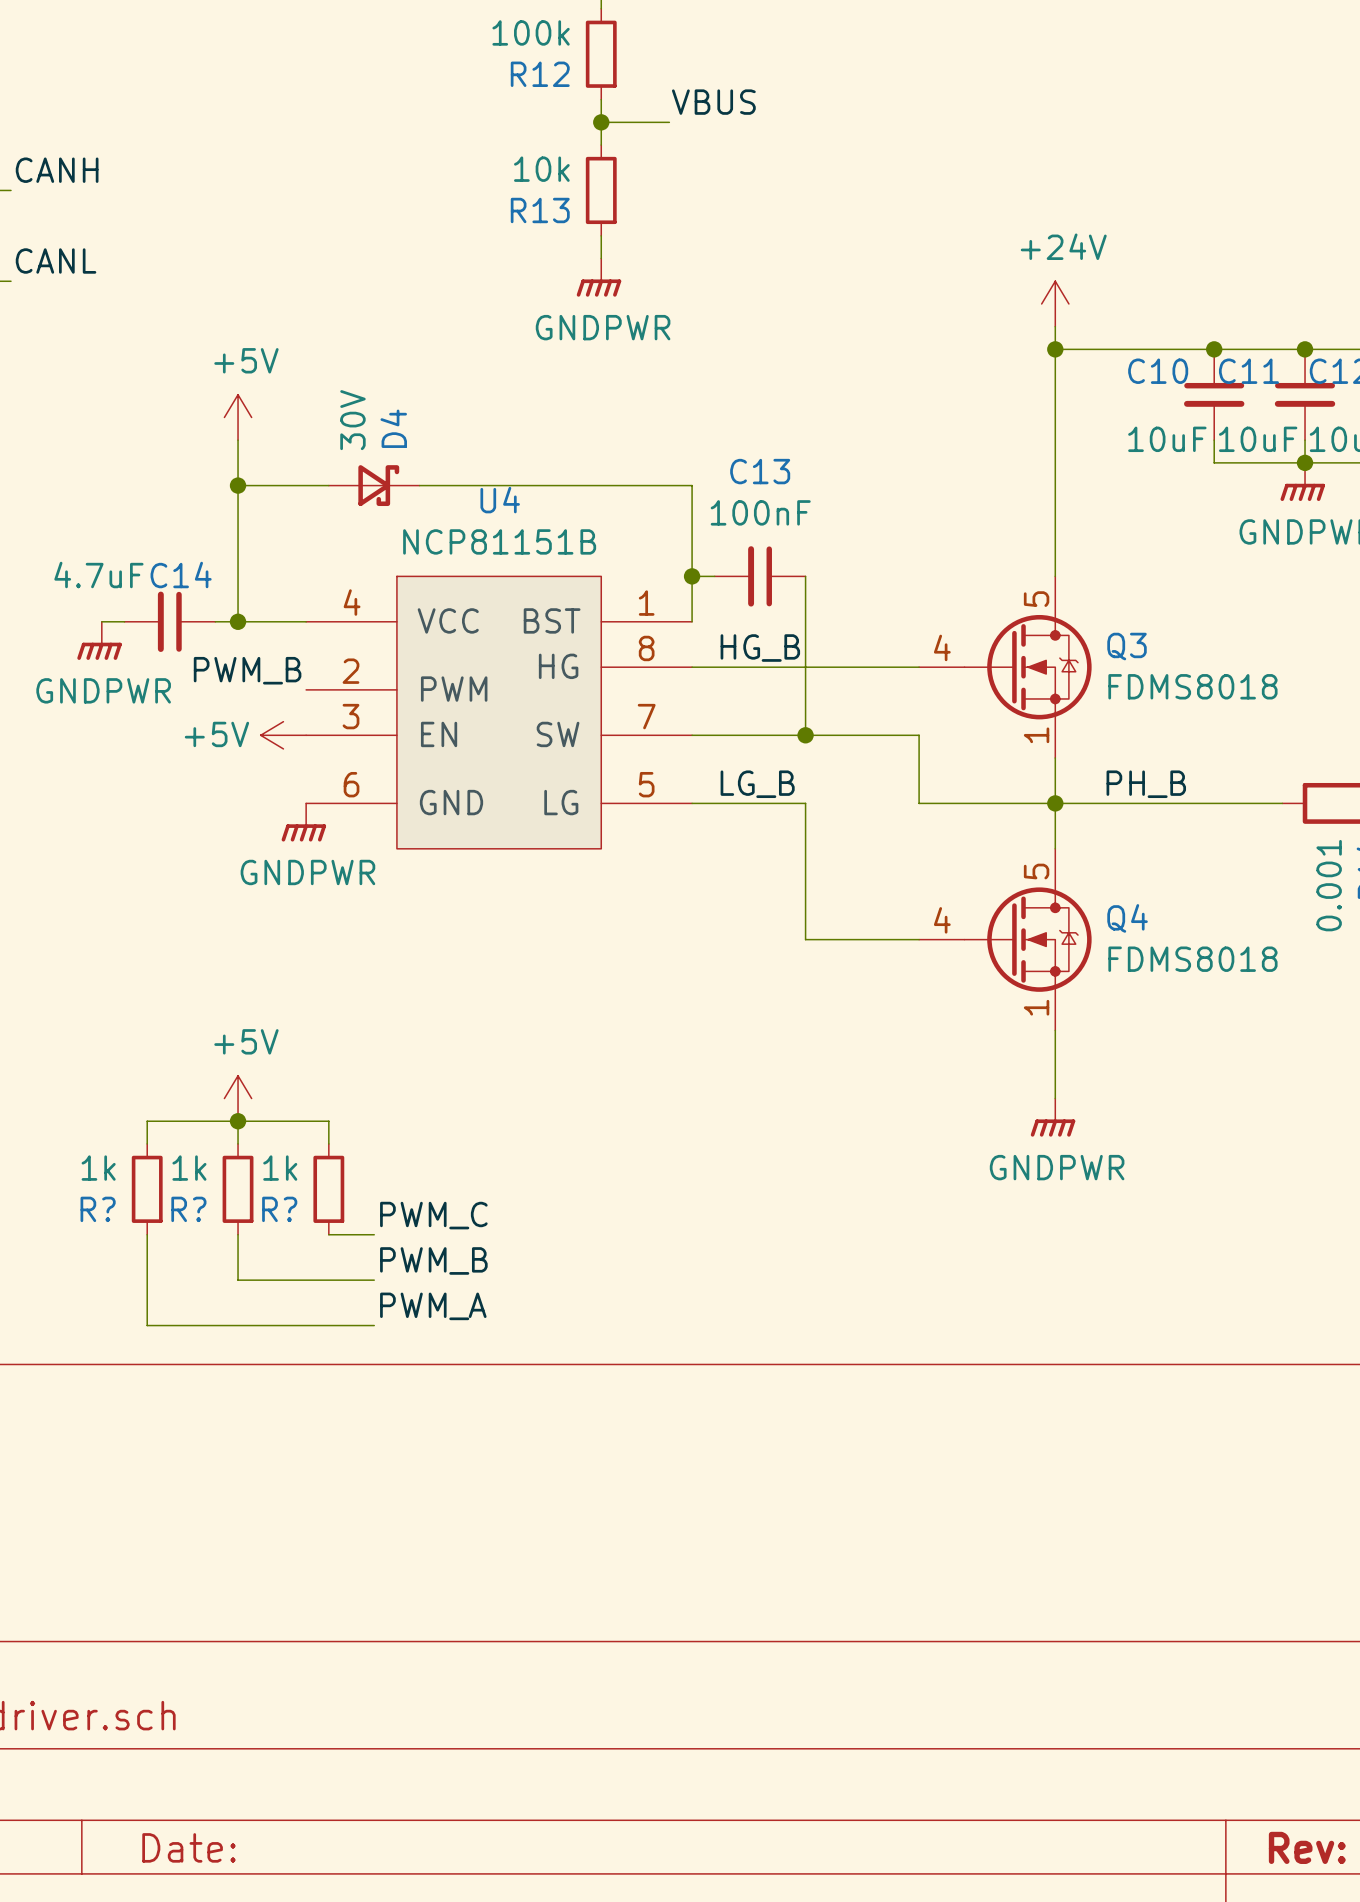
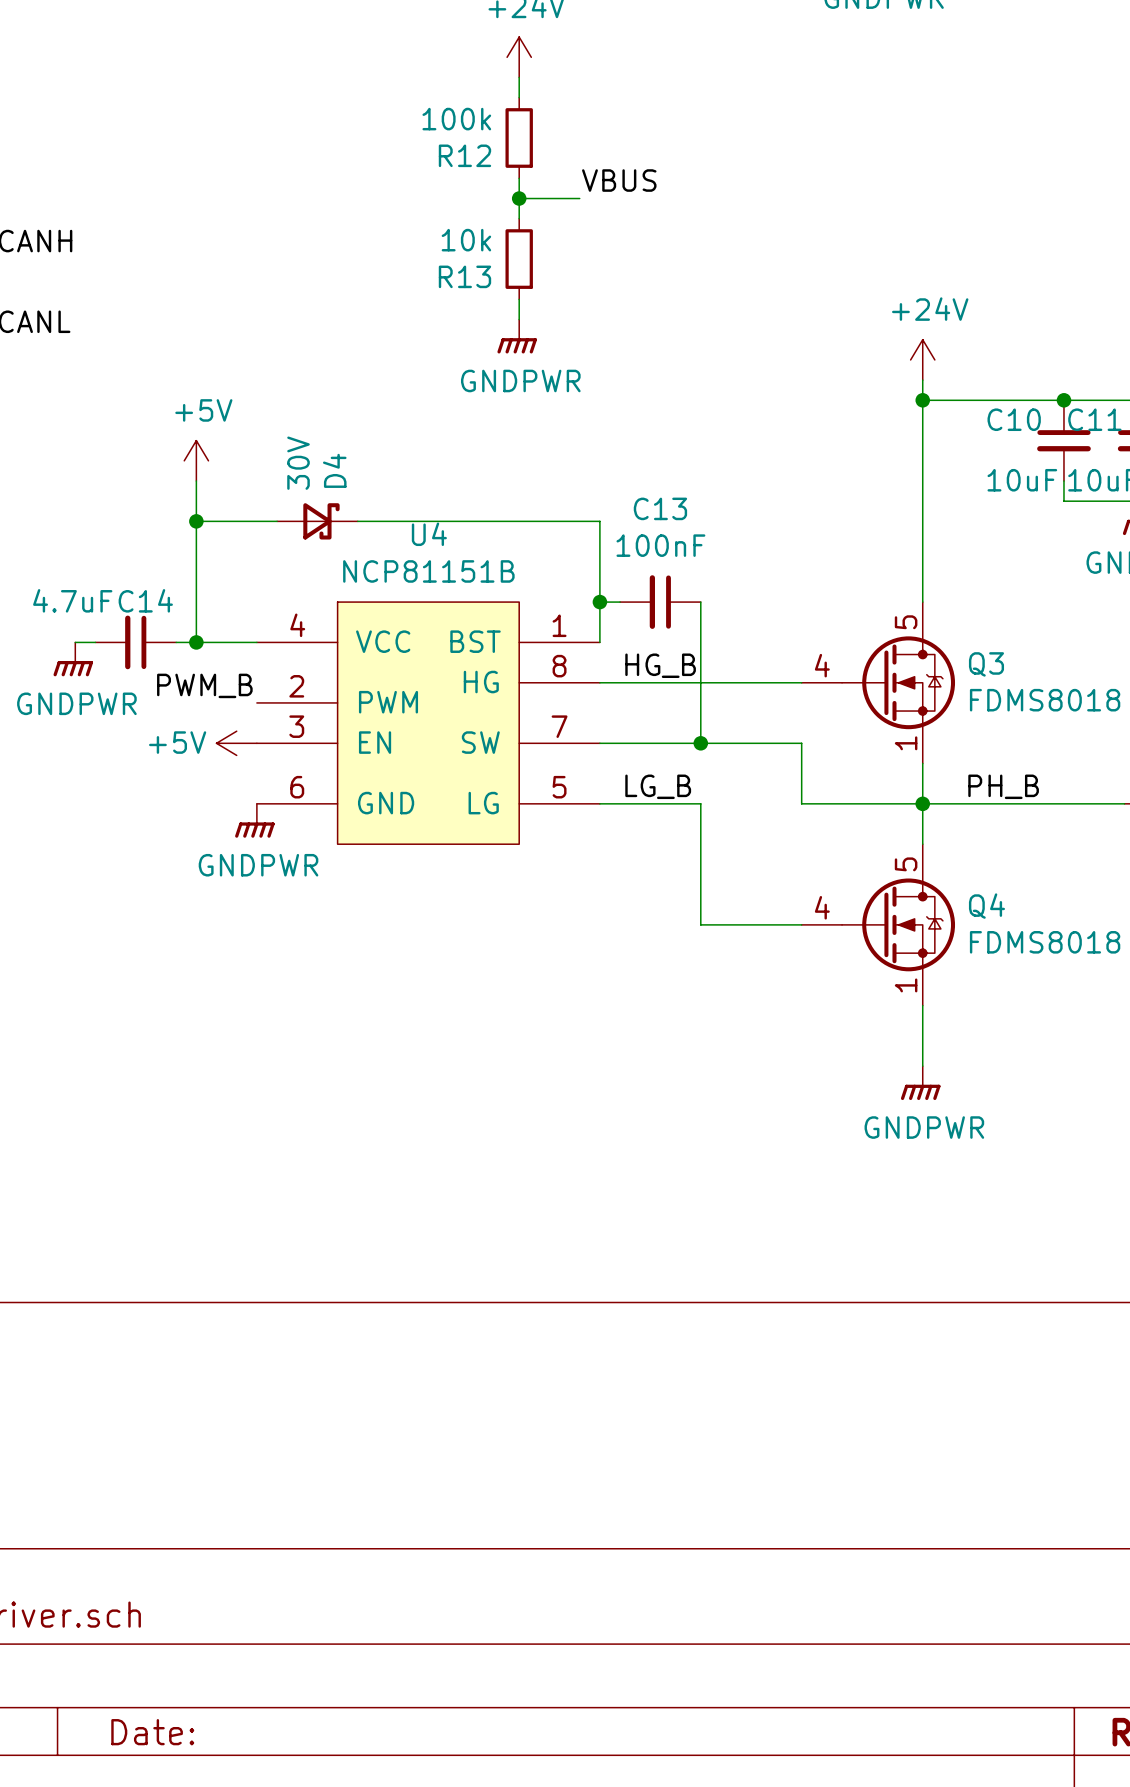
power symbol: +5V (238, 1098) -> none
wire: (238, 1121) (238, 1143) -> none
junction: (238, 1121) -> none
wire: (147, 1143) (147, 1121) (328, 1121) (328, 1143) -> none
R?: 1k (147, 1189) -> none
R?: 1k (238, 1189) -> none
R?: 1k (328, 1189) -> none
label: PWM_C (433, 1215) -> none
wire: (147, 1234) (147, 1325) (374, 1325) -> none
wire: (238, 1234) (238, 1280) (374, 1280) -> none
wire: (328, 1234) (374, 1234) -> none
label: PWM_B (433, 1260) -> none
label: PWM_A (433, 1306) -> none

